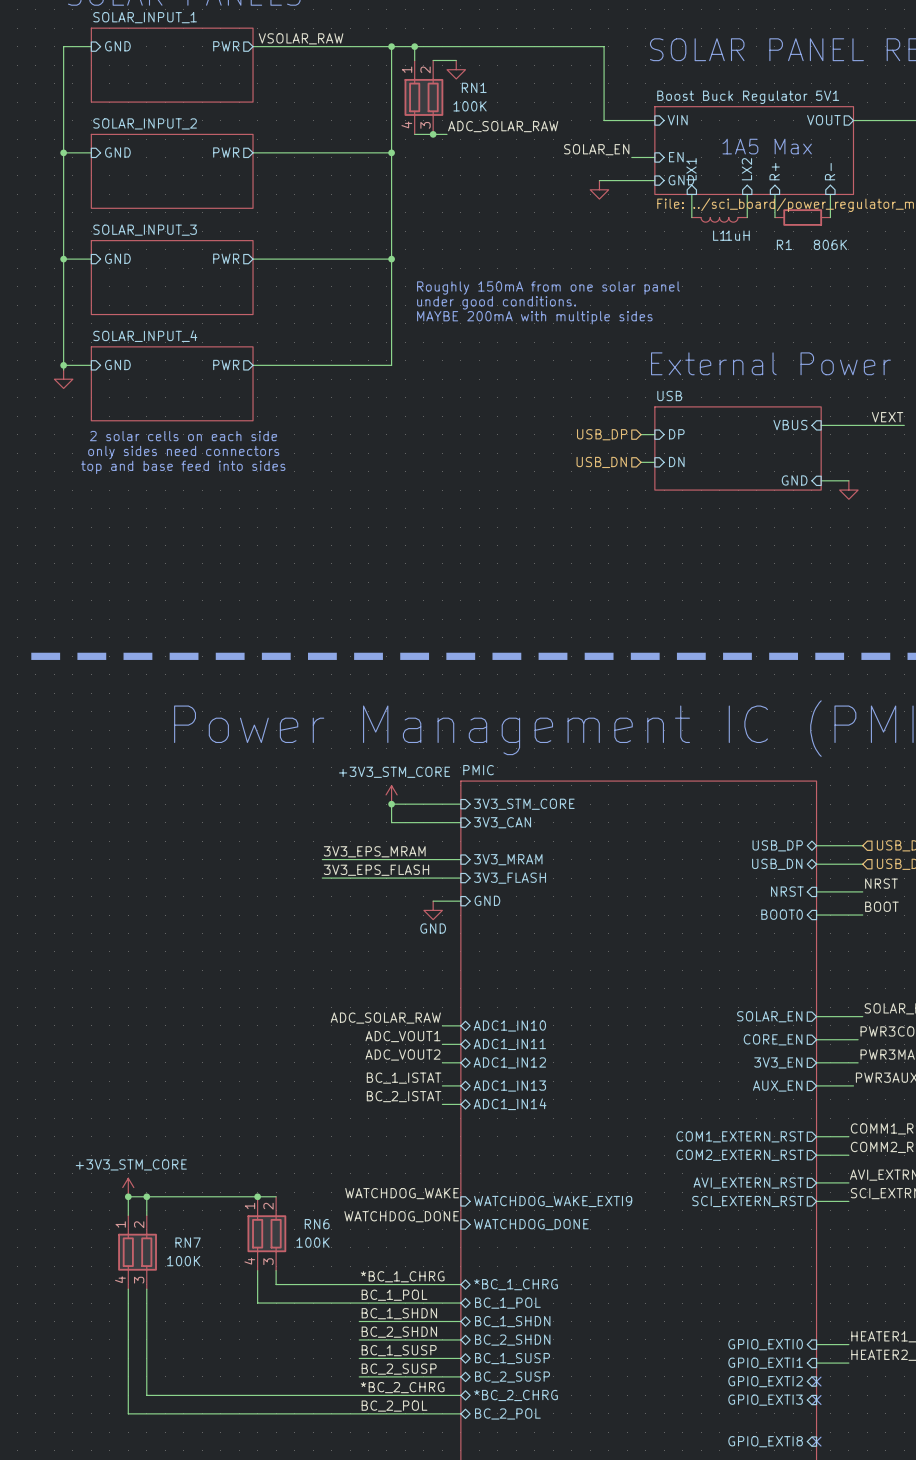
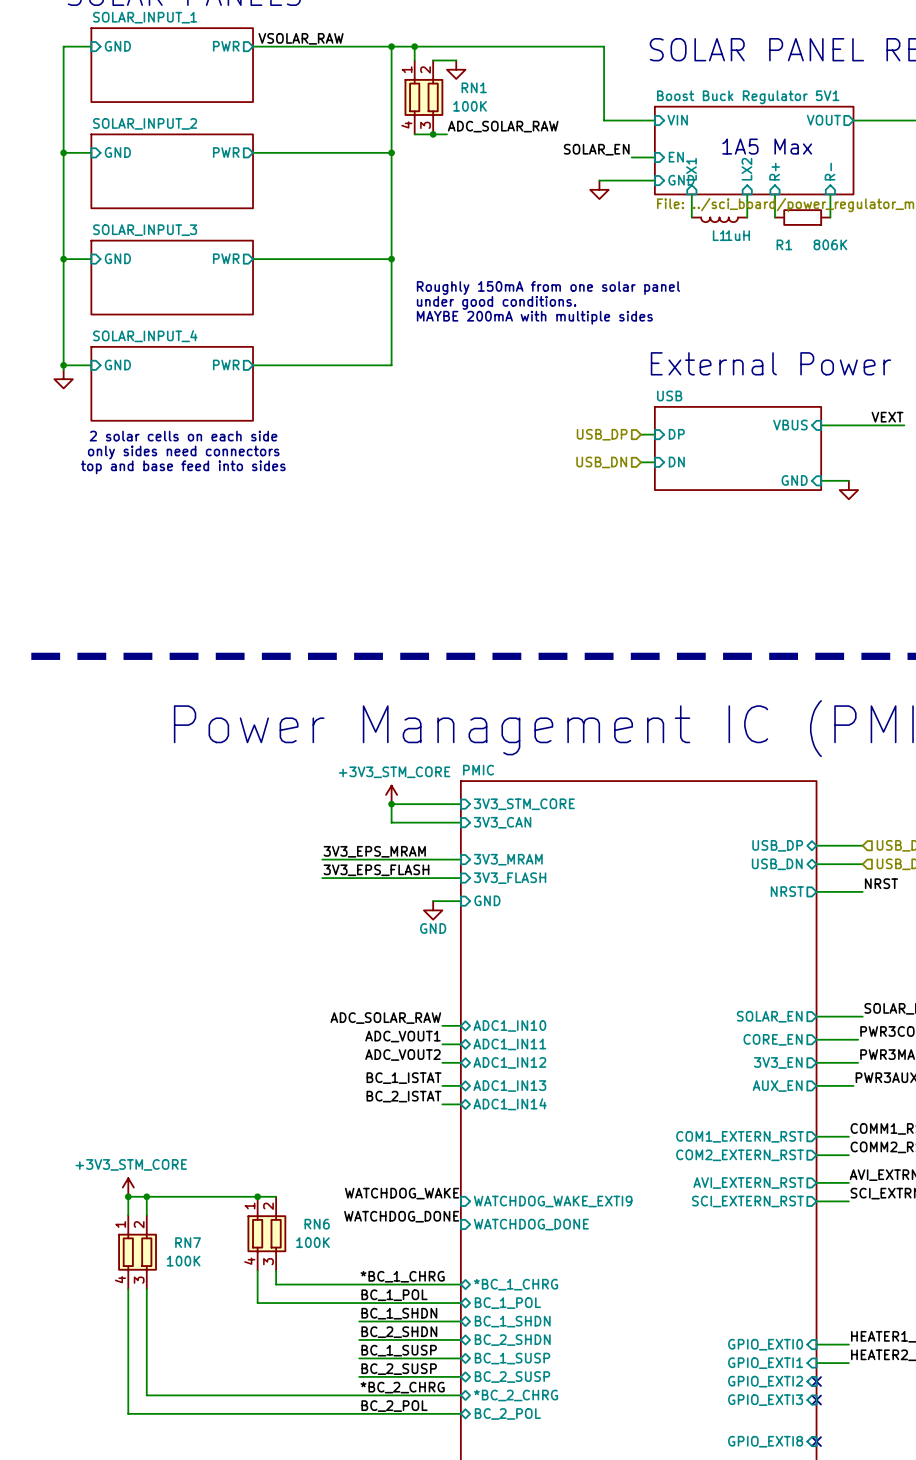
sheet pin shape: input (787, 891) -> output (787, 891)
label: BOOT (881, 906) -> none
sheet pin: BOOT0 (782, 914) -> none
wire: (816, 915) (862, 915) -> none

